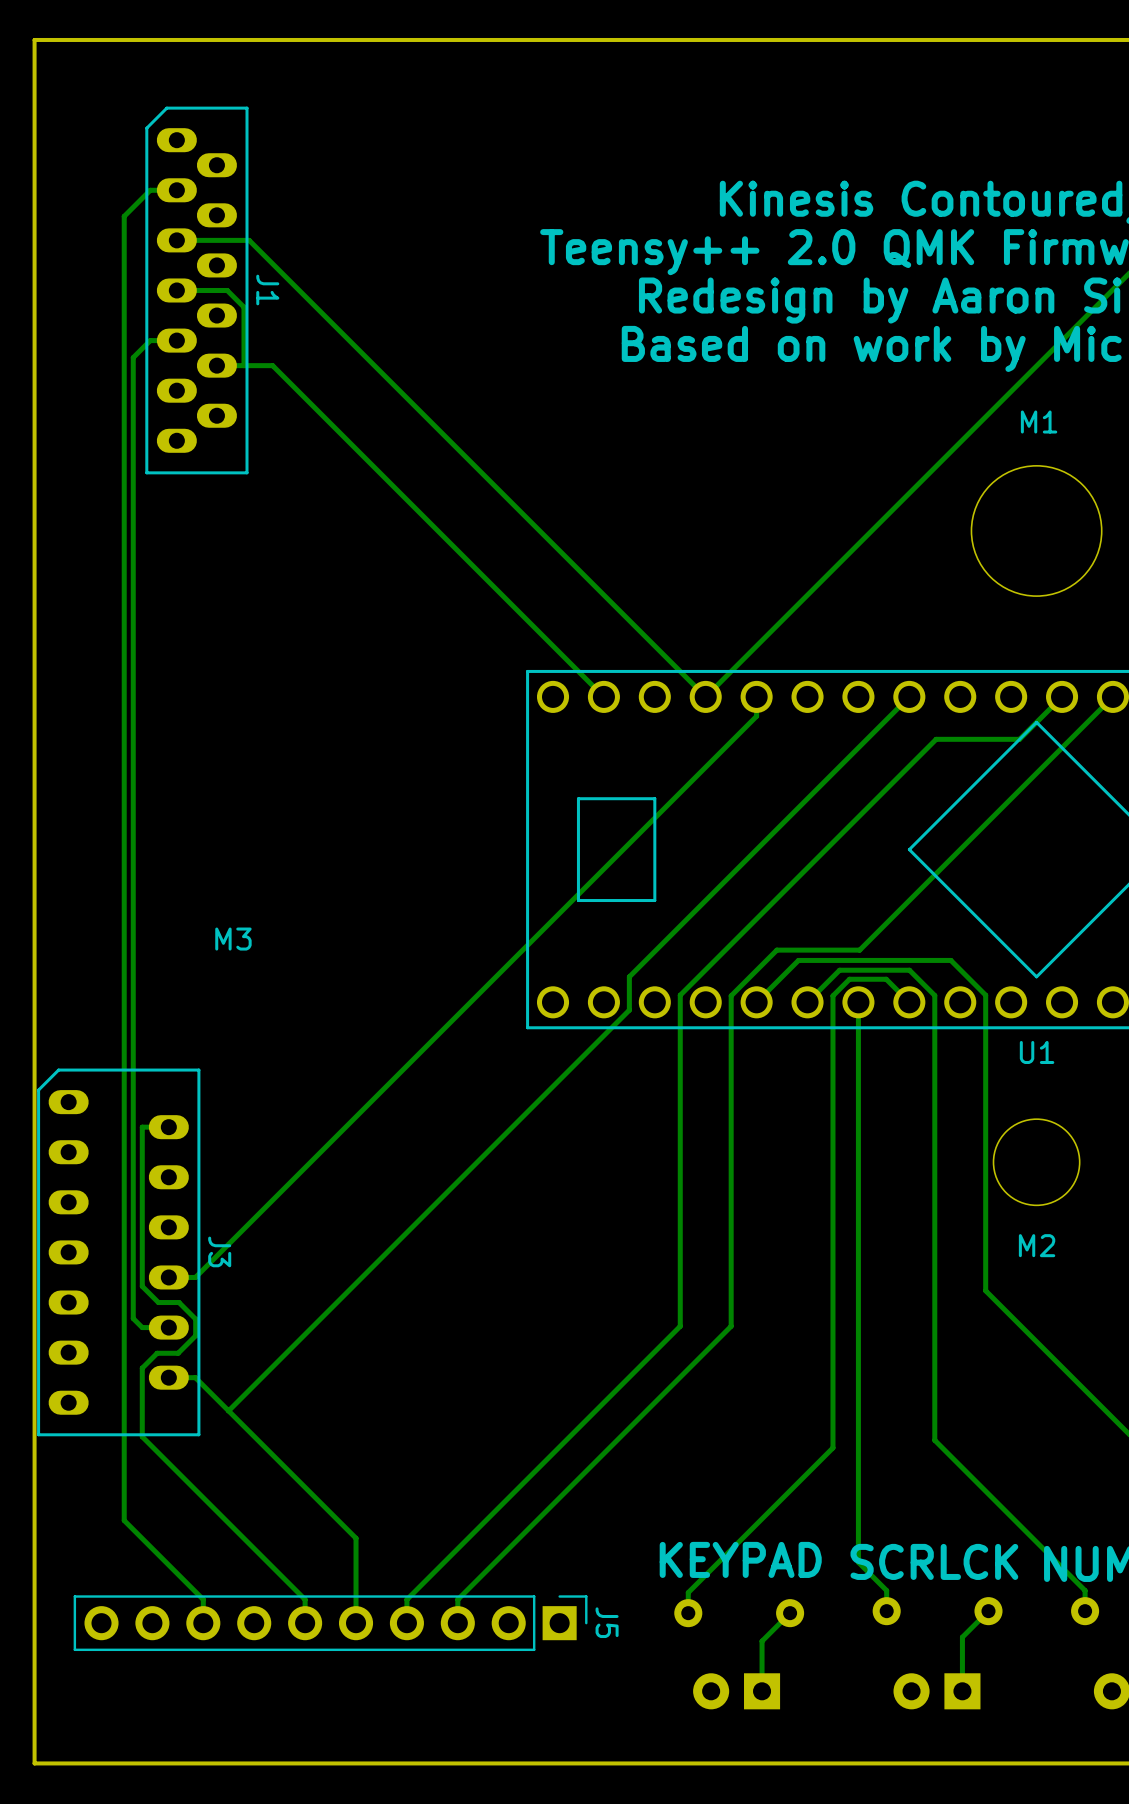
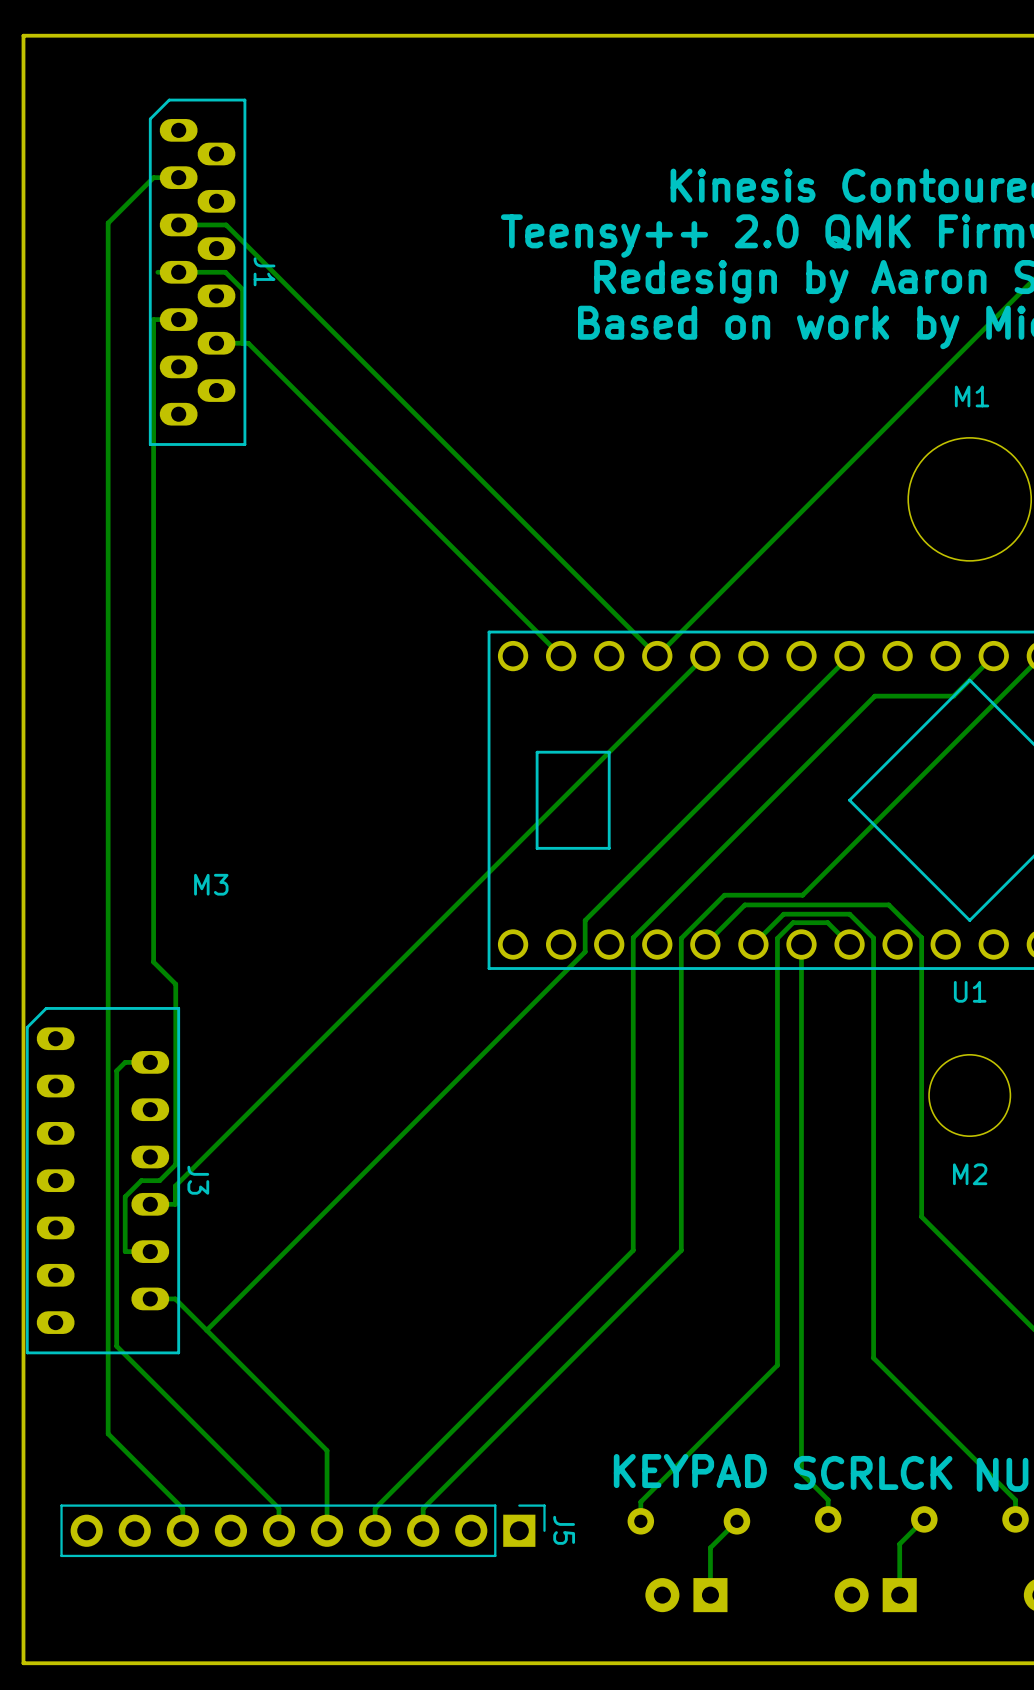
track: (172, 190) (150, 190) (124, 216) (124, 238) -> (153, 177) (108, 223)
J1 position: (196, 290) -> (197, 272)
track: (227, 290) (243, 307) (243, 365) -> (205, 272) (225, 272) (242, 289) (242, 343)
track: (172, 340) (150, 340) (133, 357) (133, 1136) -> (153, 319) (153, 962) (175, 984) (175, 1164) (159, 1180) (141, 1180) (125, 1196)
track: (756, 696) (756, 716) (195, 1277) -> (705, 656) (175, 1186) (175, 1204)
track: (142, 1127) (142, 1269) -> (125, 1062) (116, 1070)
track: (142, 1286) (158, 1302) (179, 1302) (195, 1319) (195, 1335) (178, 1353) (157, 1353) (142, 1368) (142, 1436) -> (116, 1243) (116, 1346) (125, 1354)
track: (133, 1318) (142, 1327) -> (125, 1212) (125, 1251)

